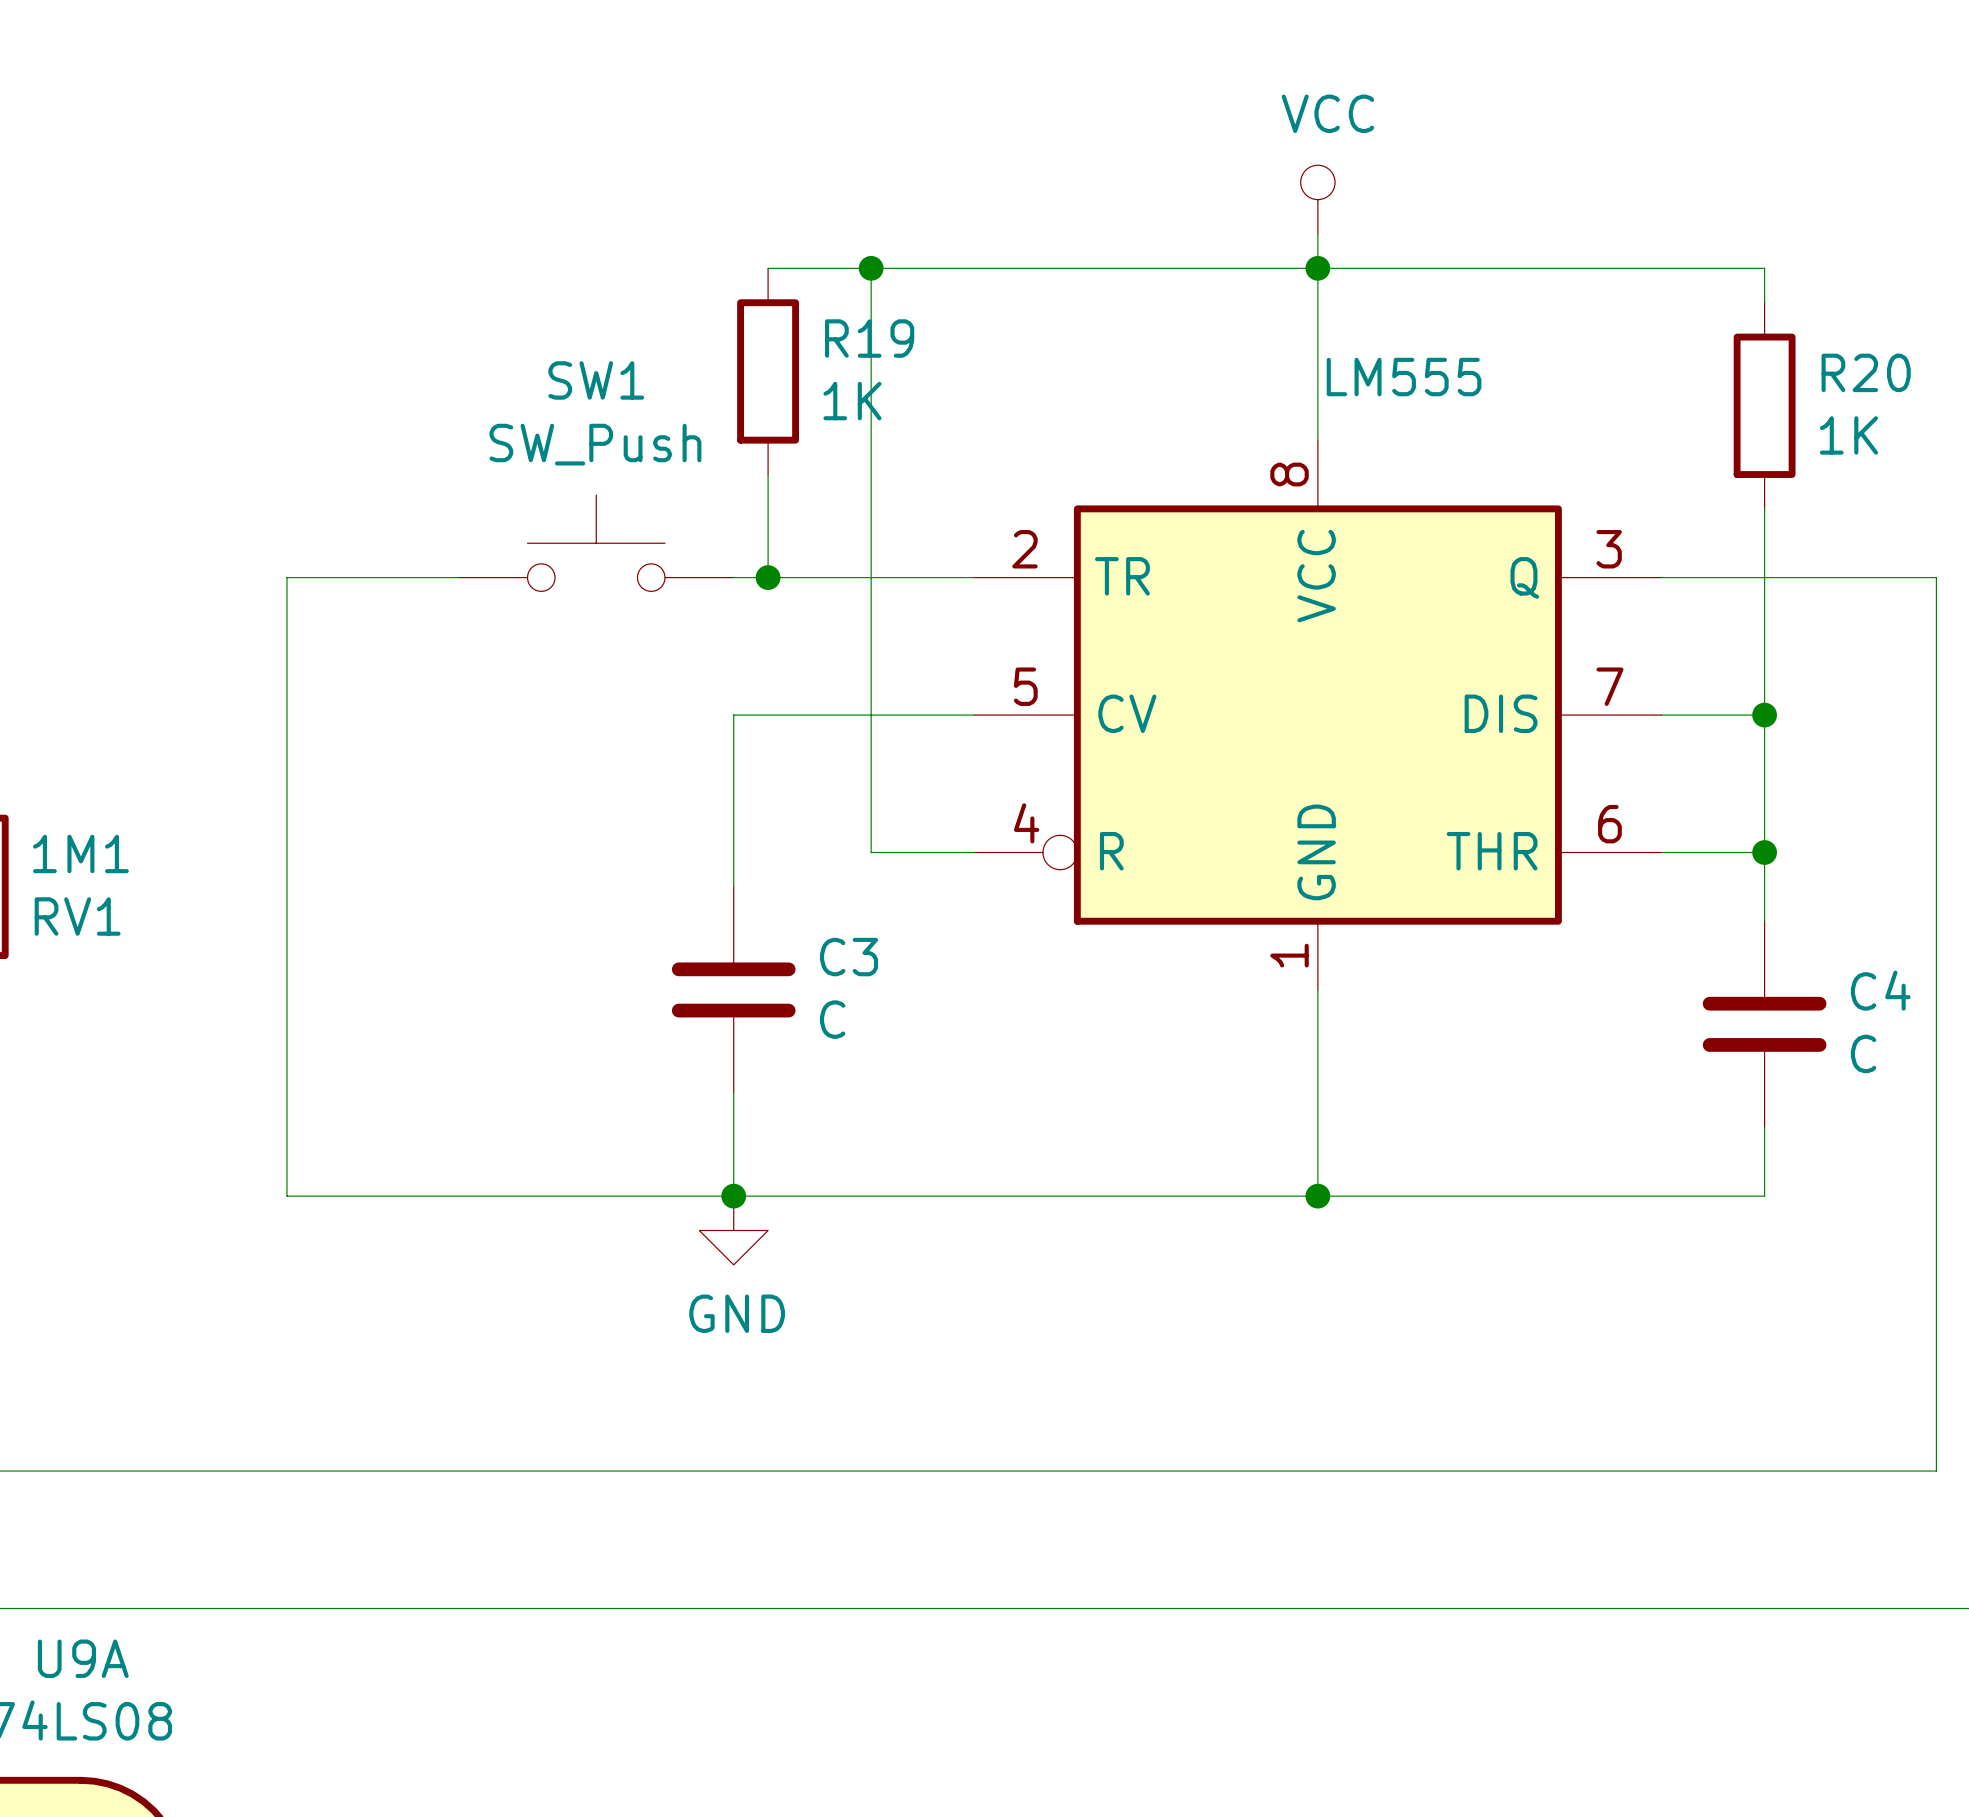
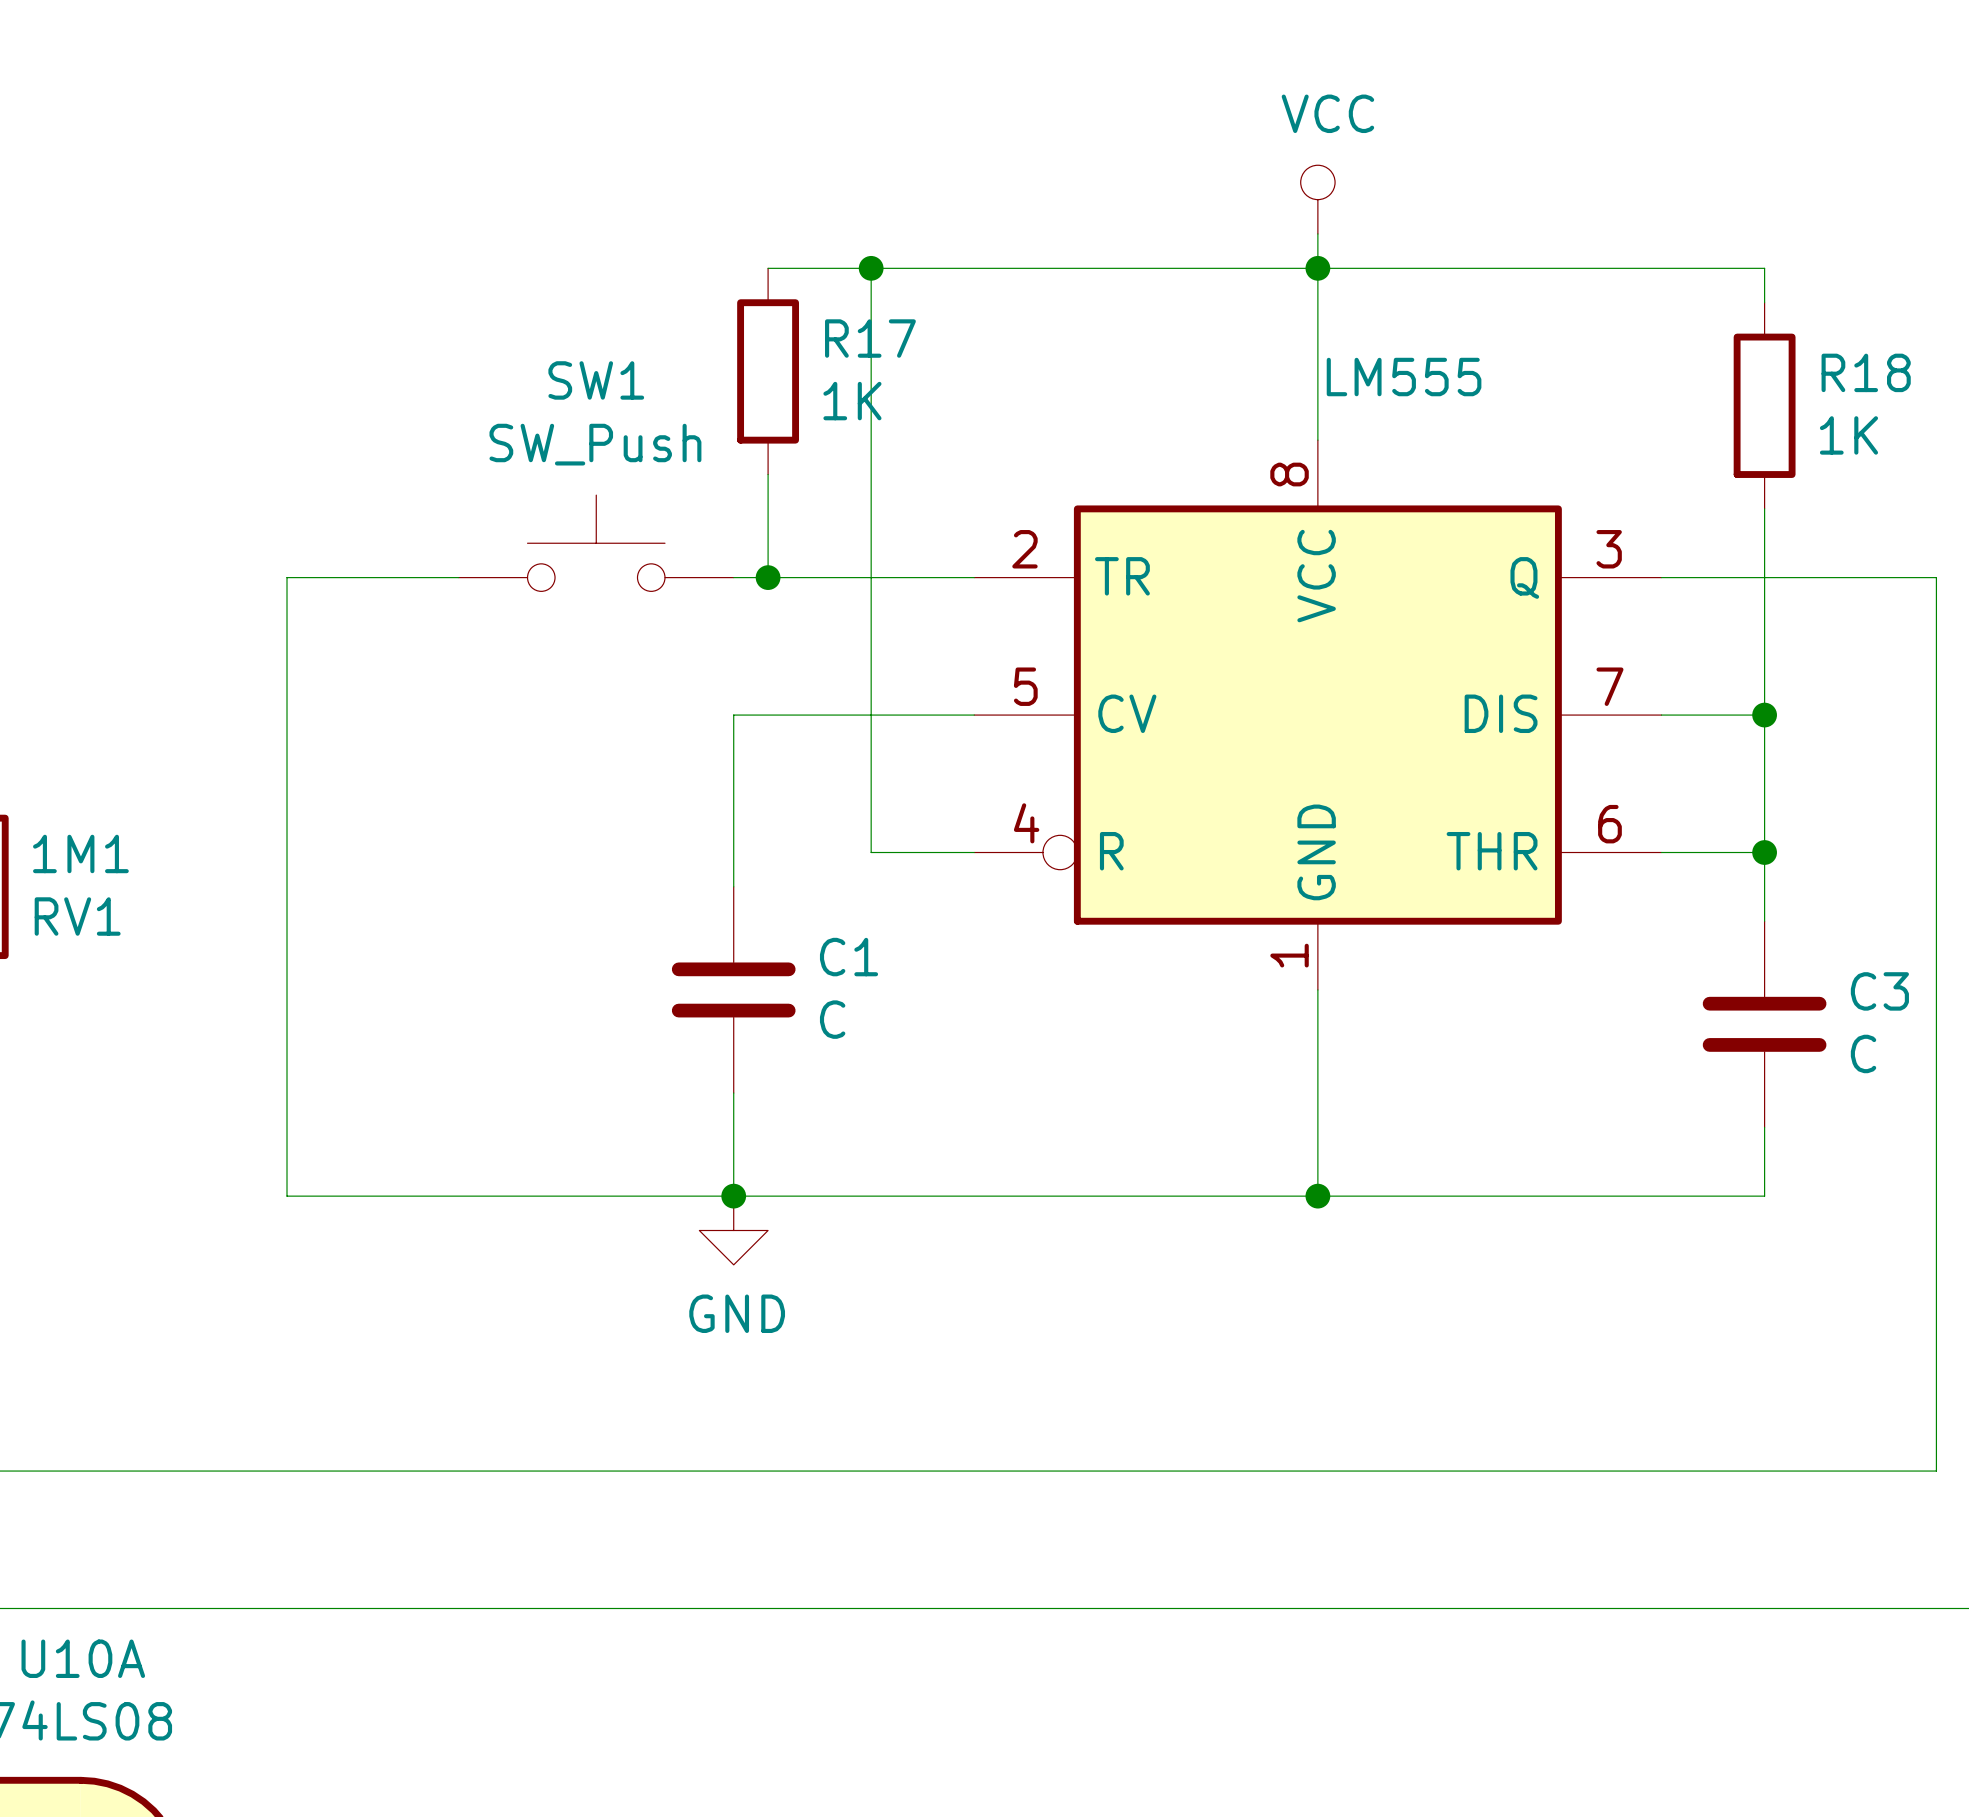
R19 name: R19 (869, 338) -> R17 (870, 338)
R20 name: R20 (1866, 372) -> R18 (1866, 372)
C3 name: C3 (849, 957) -> C1 (849, 957)
C4 name: C4 (1880, 990) -> C3 (1879, 991)
U9A name: U9A (83, 1658) -> U10A (83, 1658)

